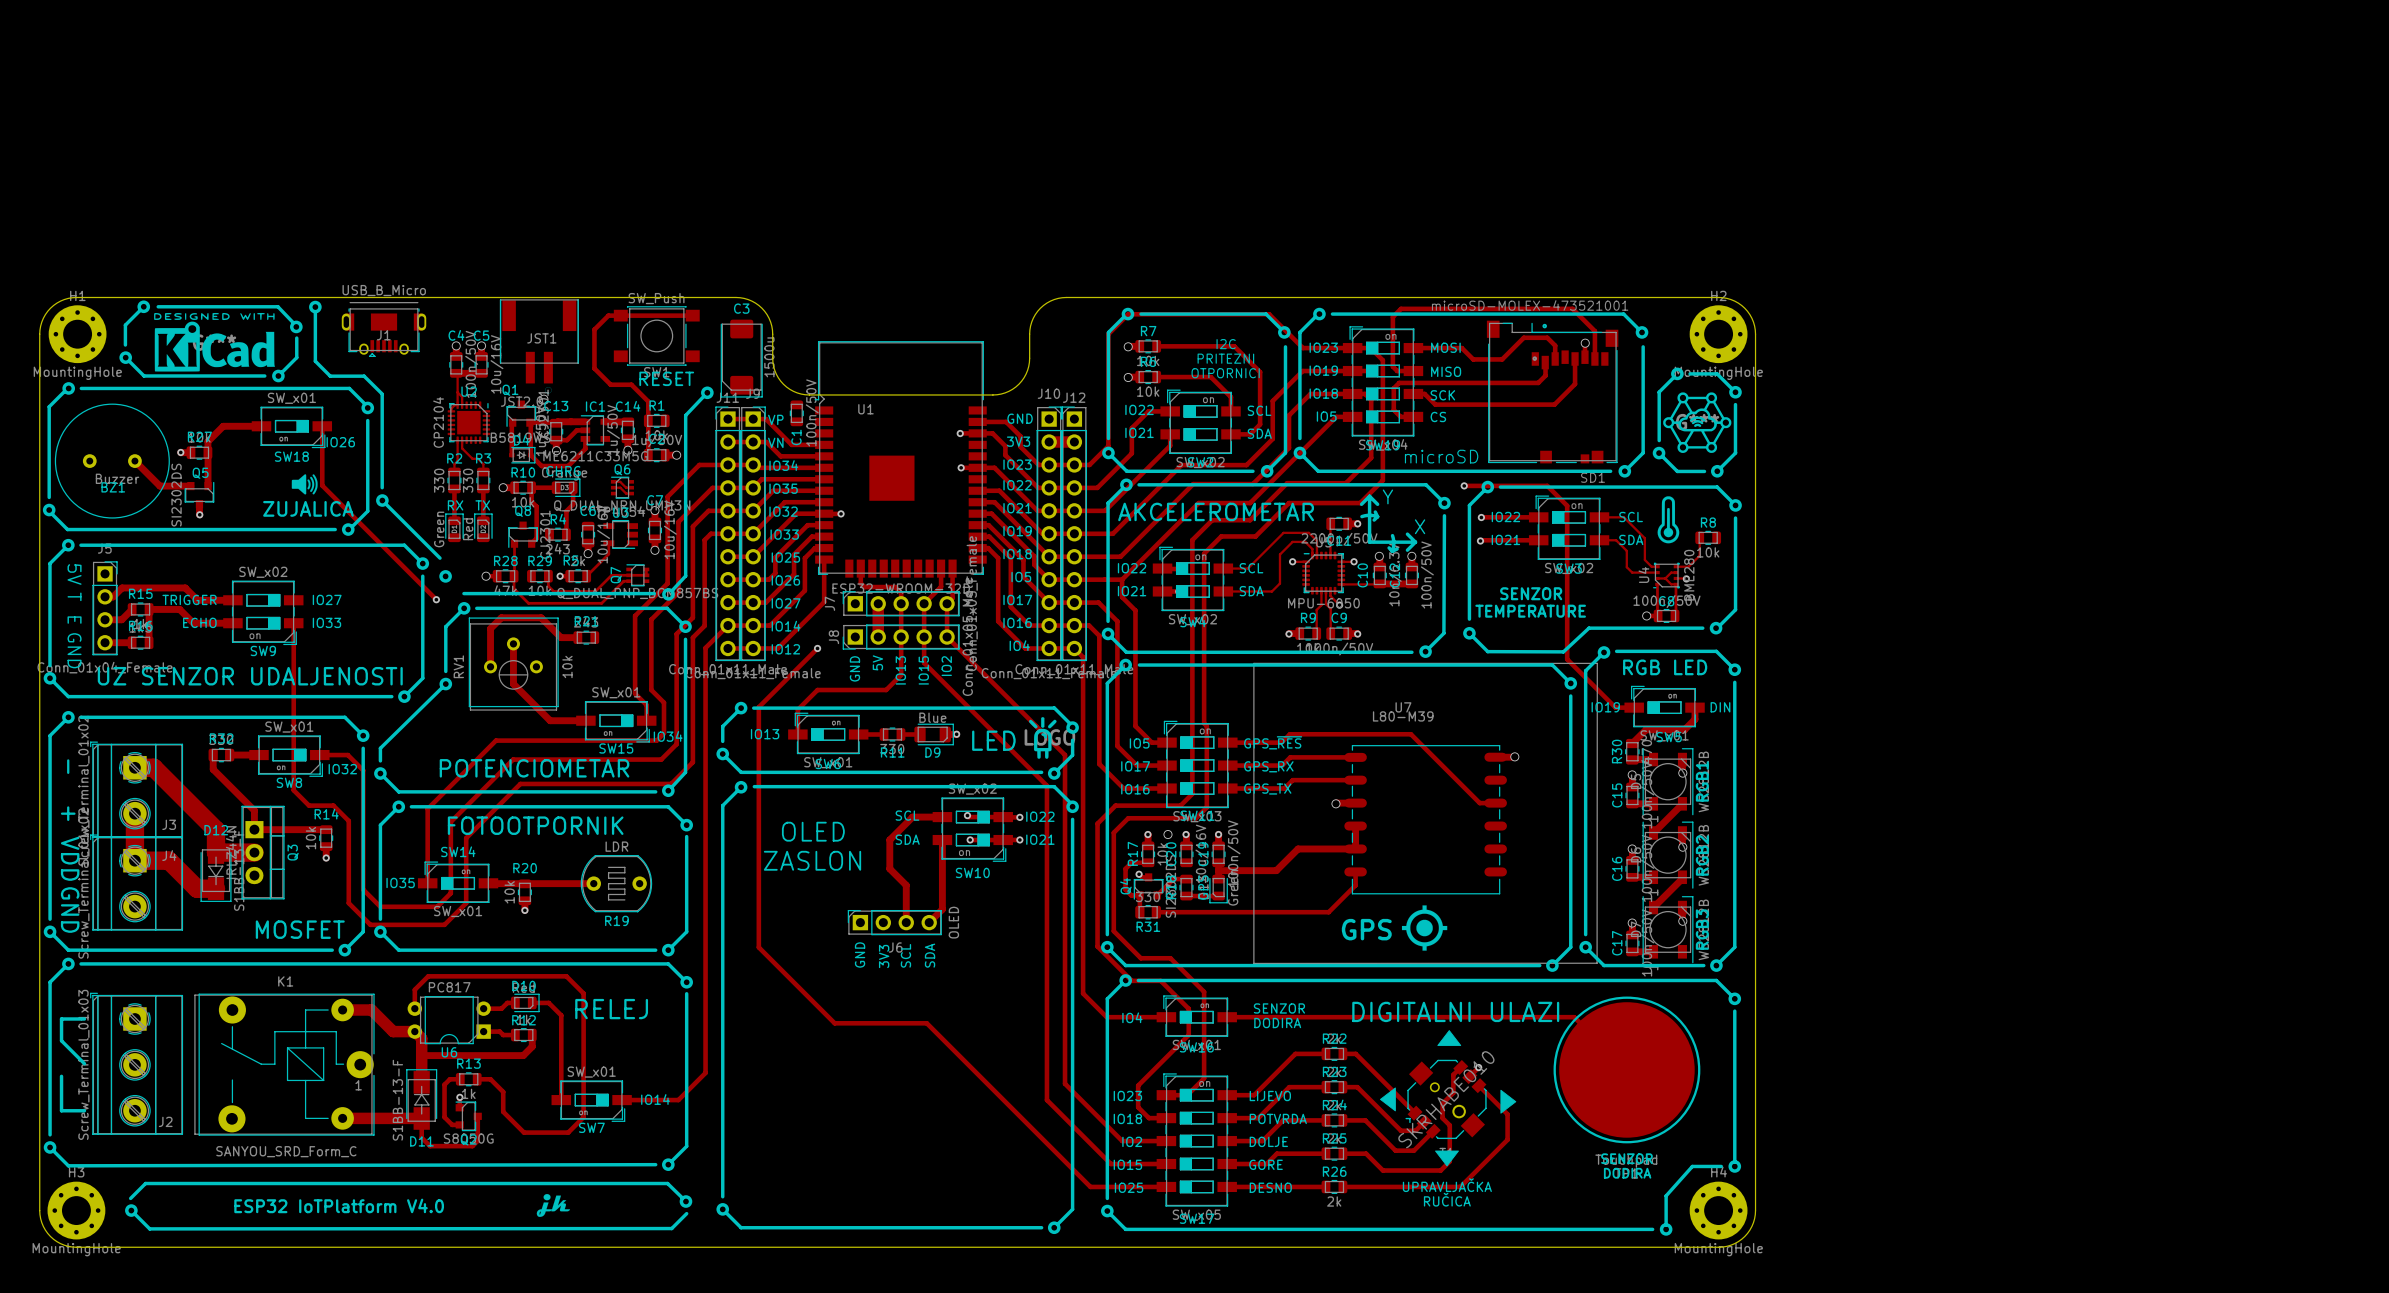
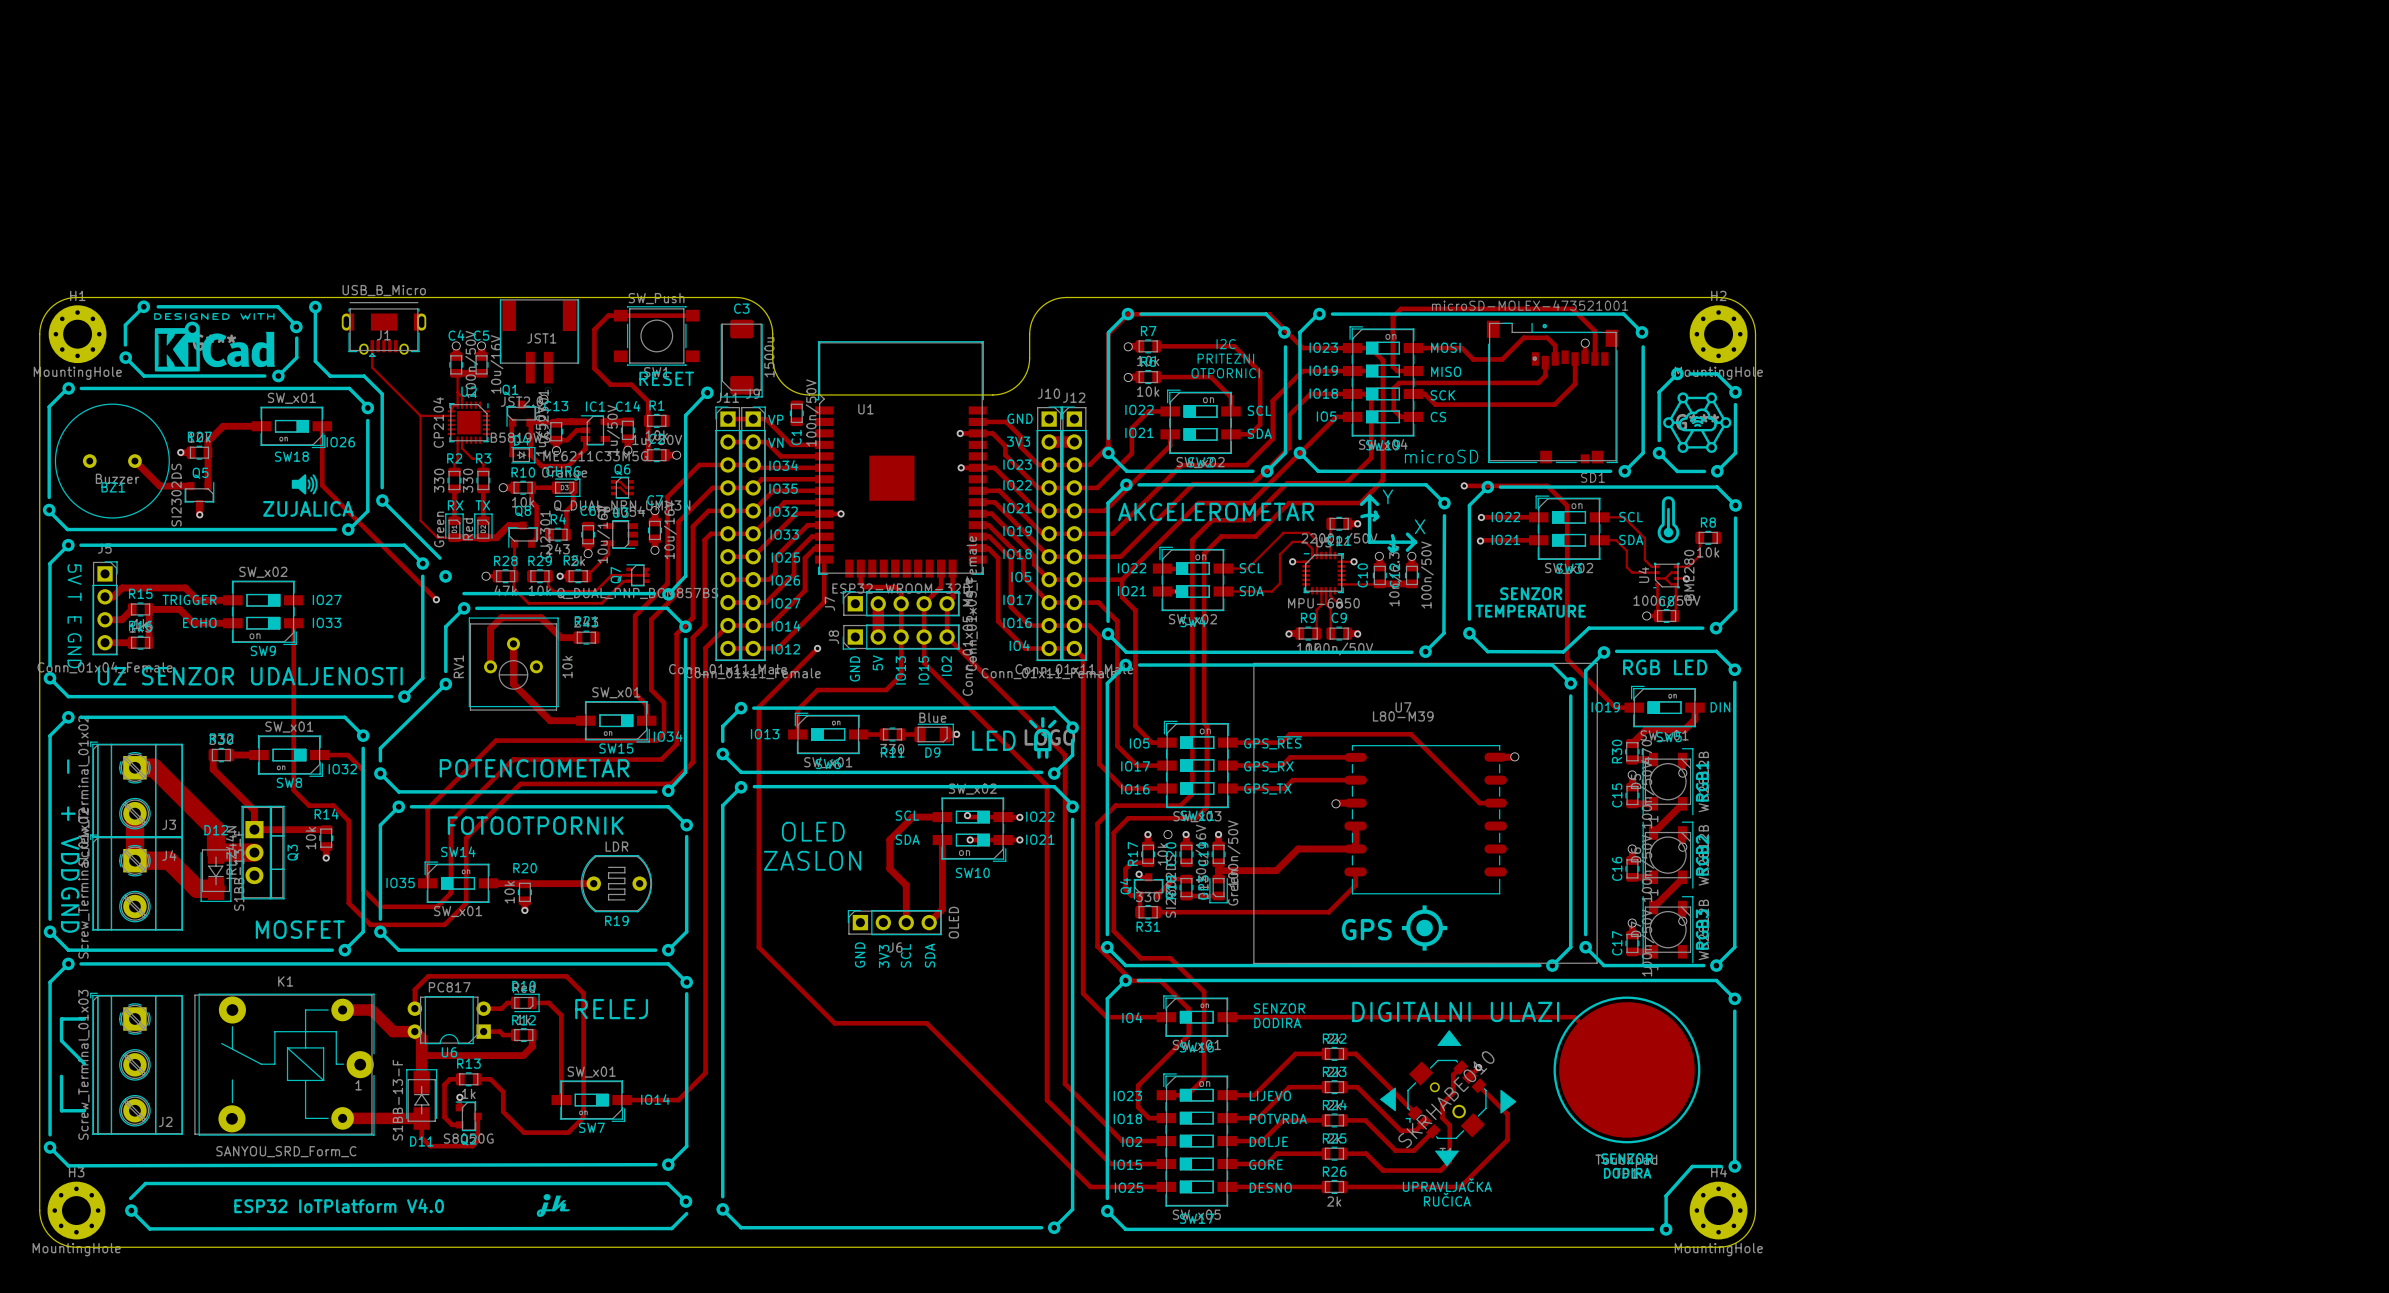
track: none -> (372, 346) (372, 367) (420, 415)
track: none -> (420, 415) (420, 520) (437, 537) (496, 537) (508, 525) (523, 525)
track: none -> (420, 415) (451, 415)

